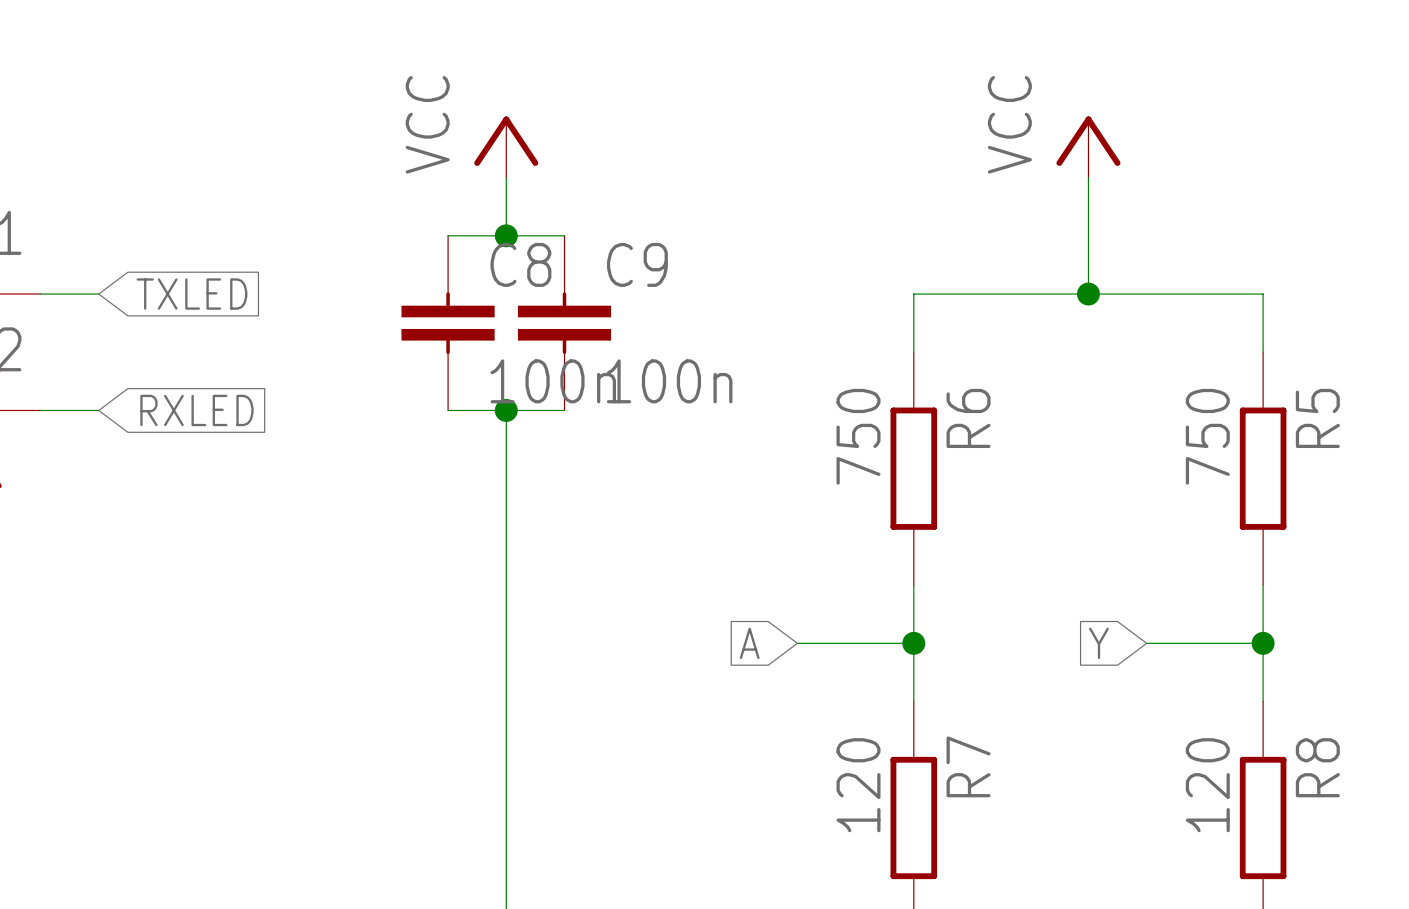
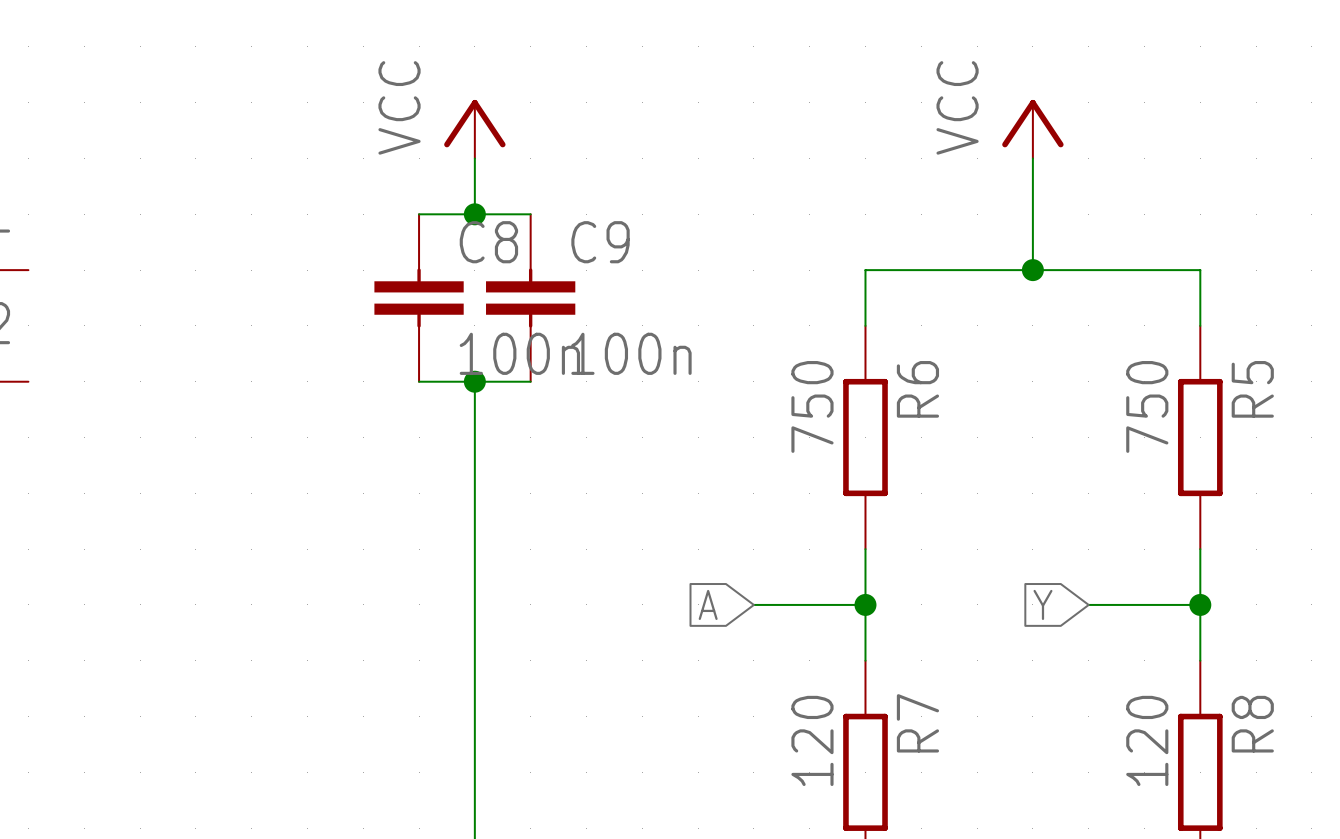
wire: (40, 294) (98, 294) -> none
global label: TXLED (191, 294) -> none
wire: (40, 410) (98, 410) -> none
global label: RXLED (196, 410) -> none

